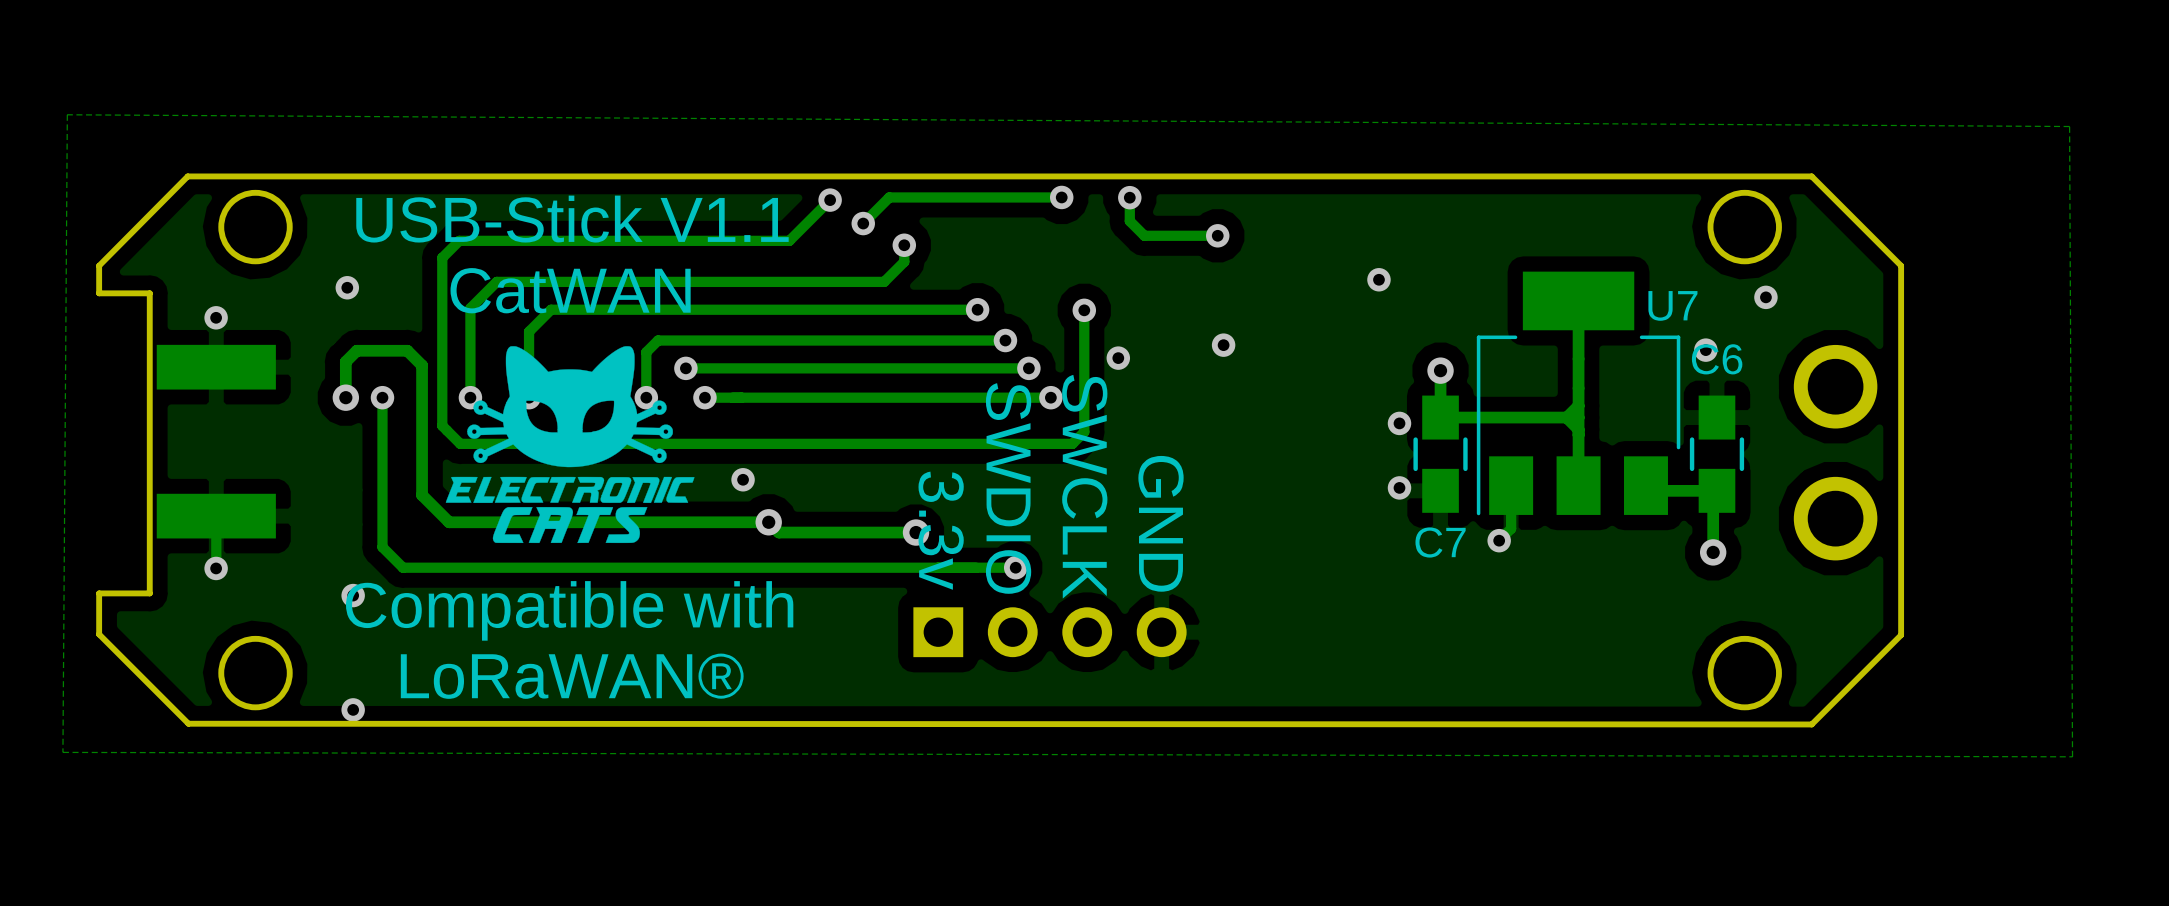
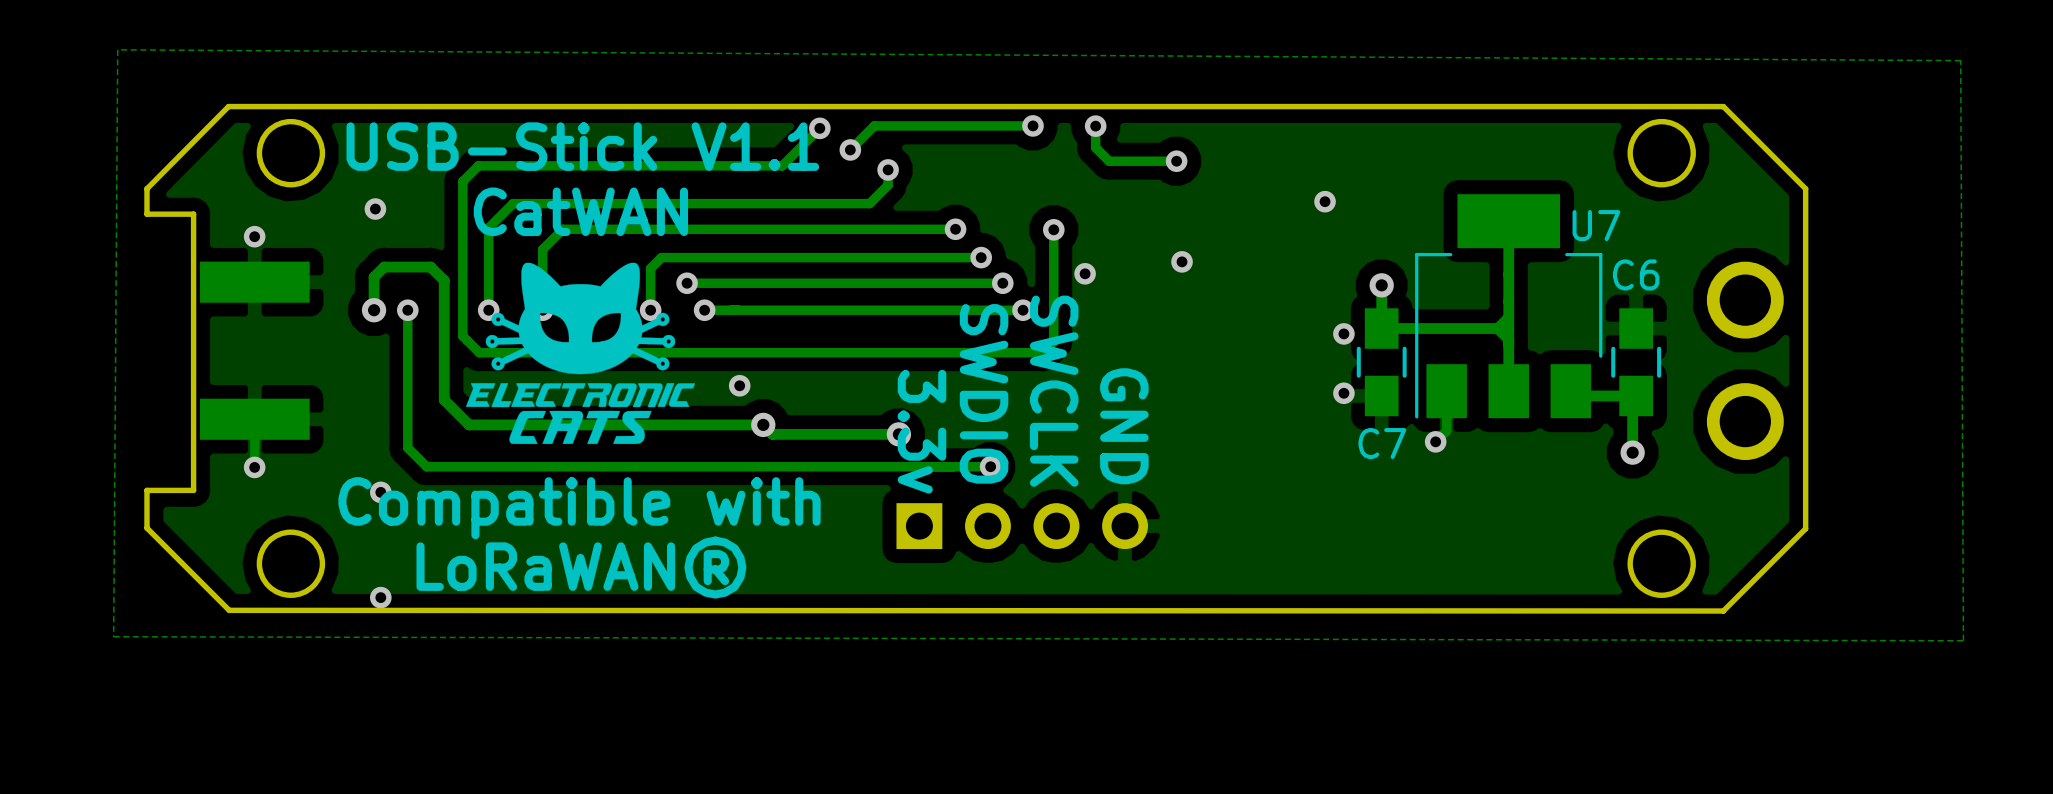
via: (1765, 297) -> none
via: (1705, 350) -> none

